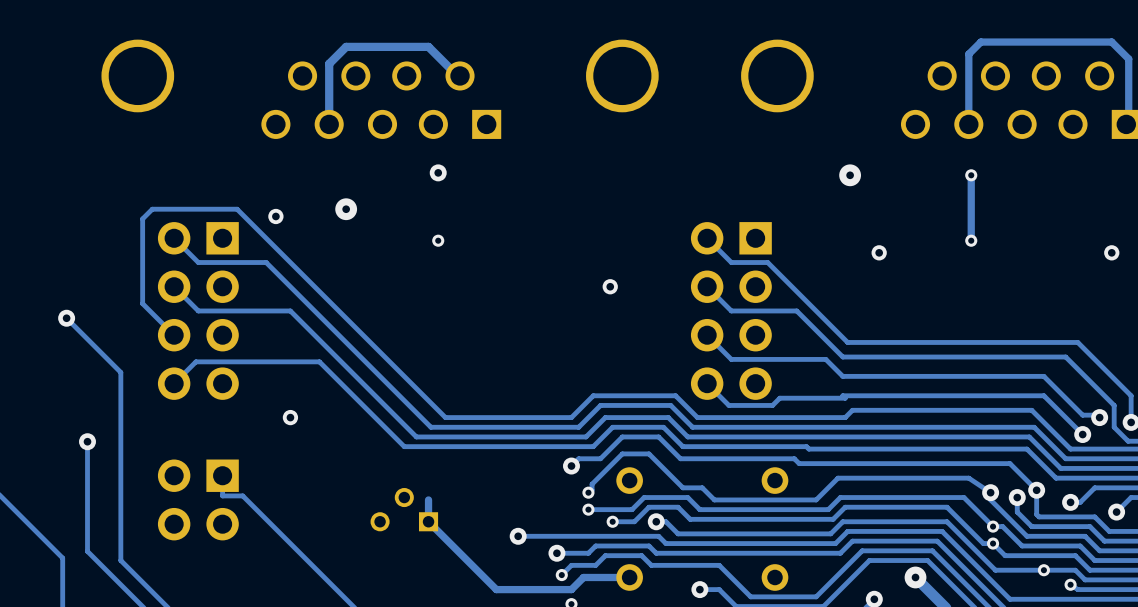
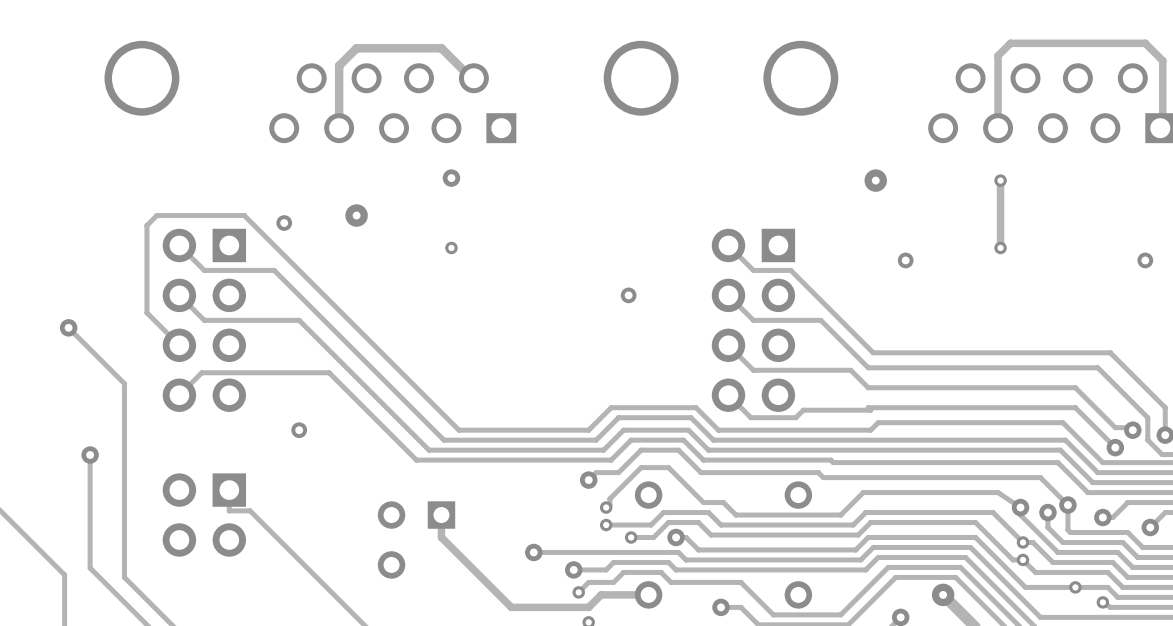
part footprint: [370, 487, 439, 532] -> [377, 501, 456, 579]

